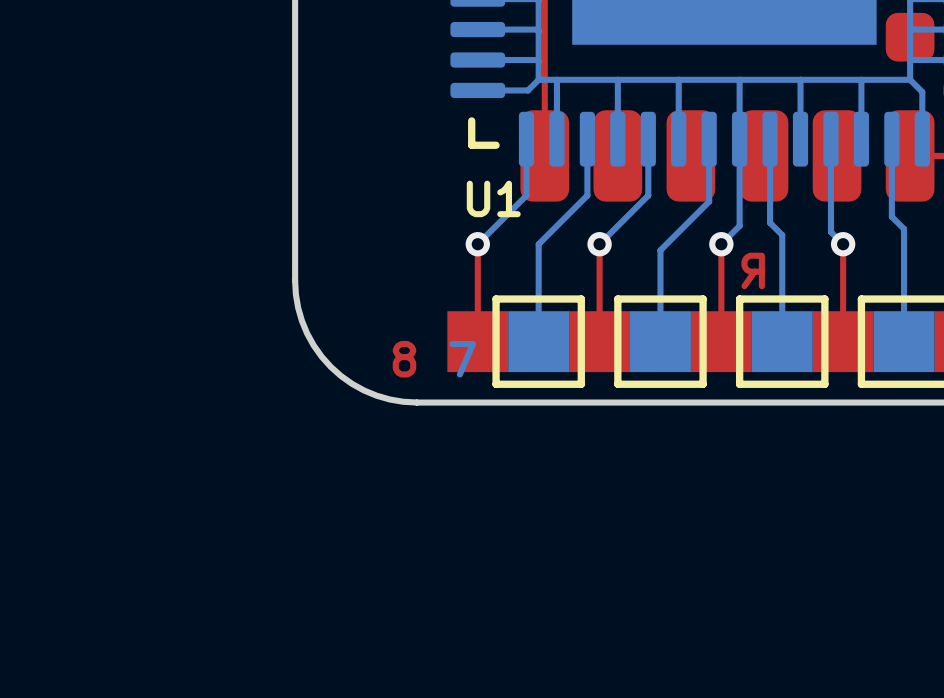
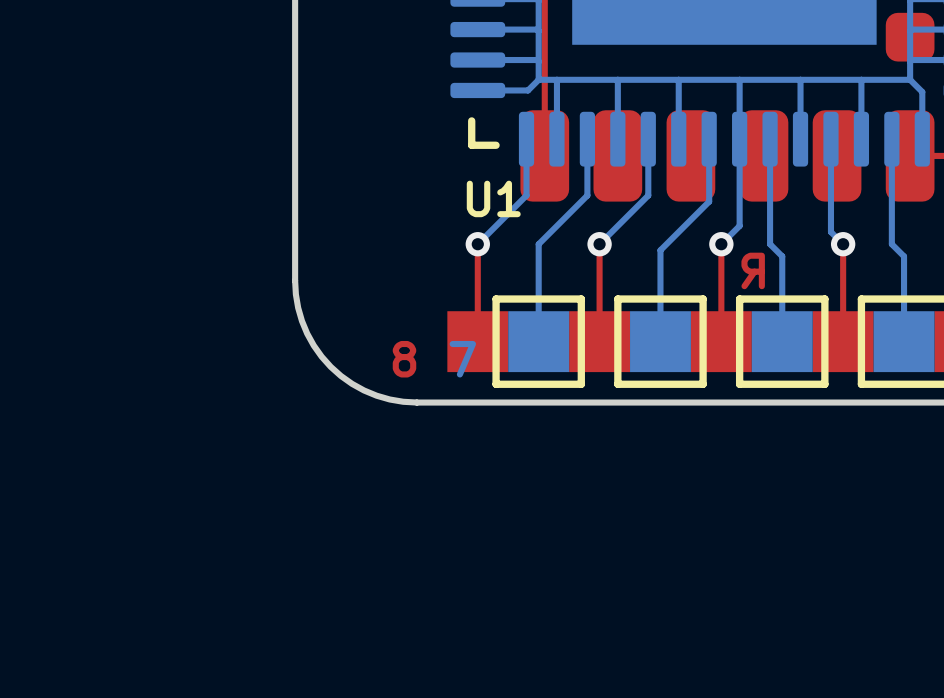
bottom track: (891, 216) (904, 229) (904, 256) -> (891, 216) (891, 244) (904, 256)
bottom track: (770, 222) (782, 235) (782, 256) -> (770, 222) (770, 244) (782, 256)

